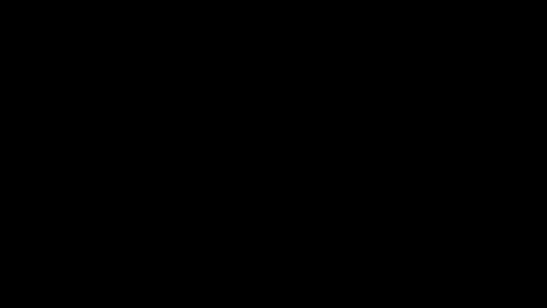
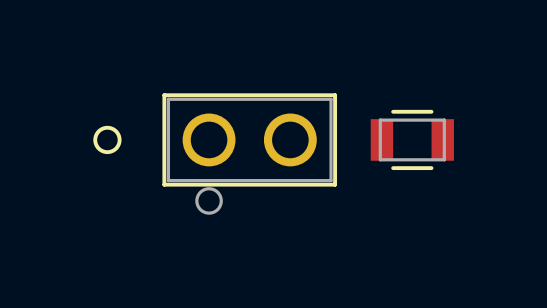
part: none -> (412, 139)
part: none -> (215, 154)

